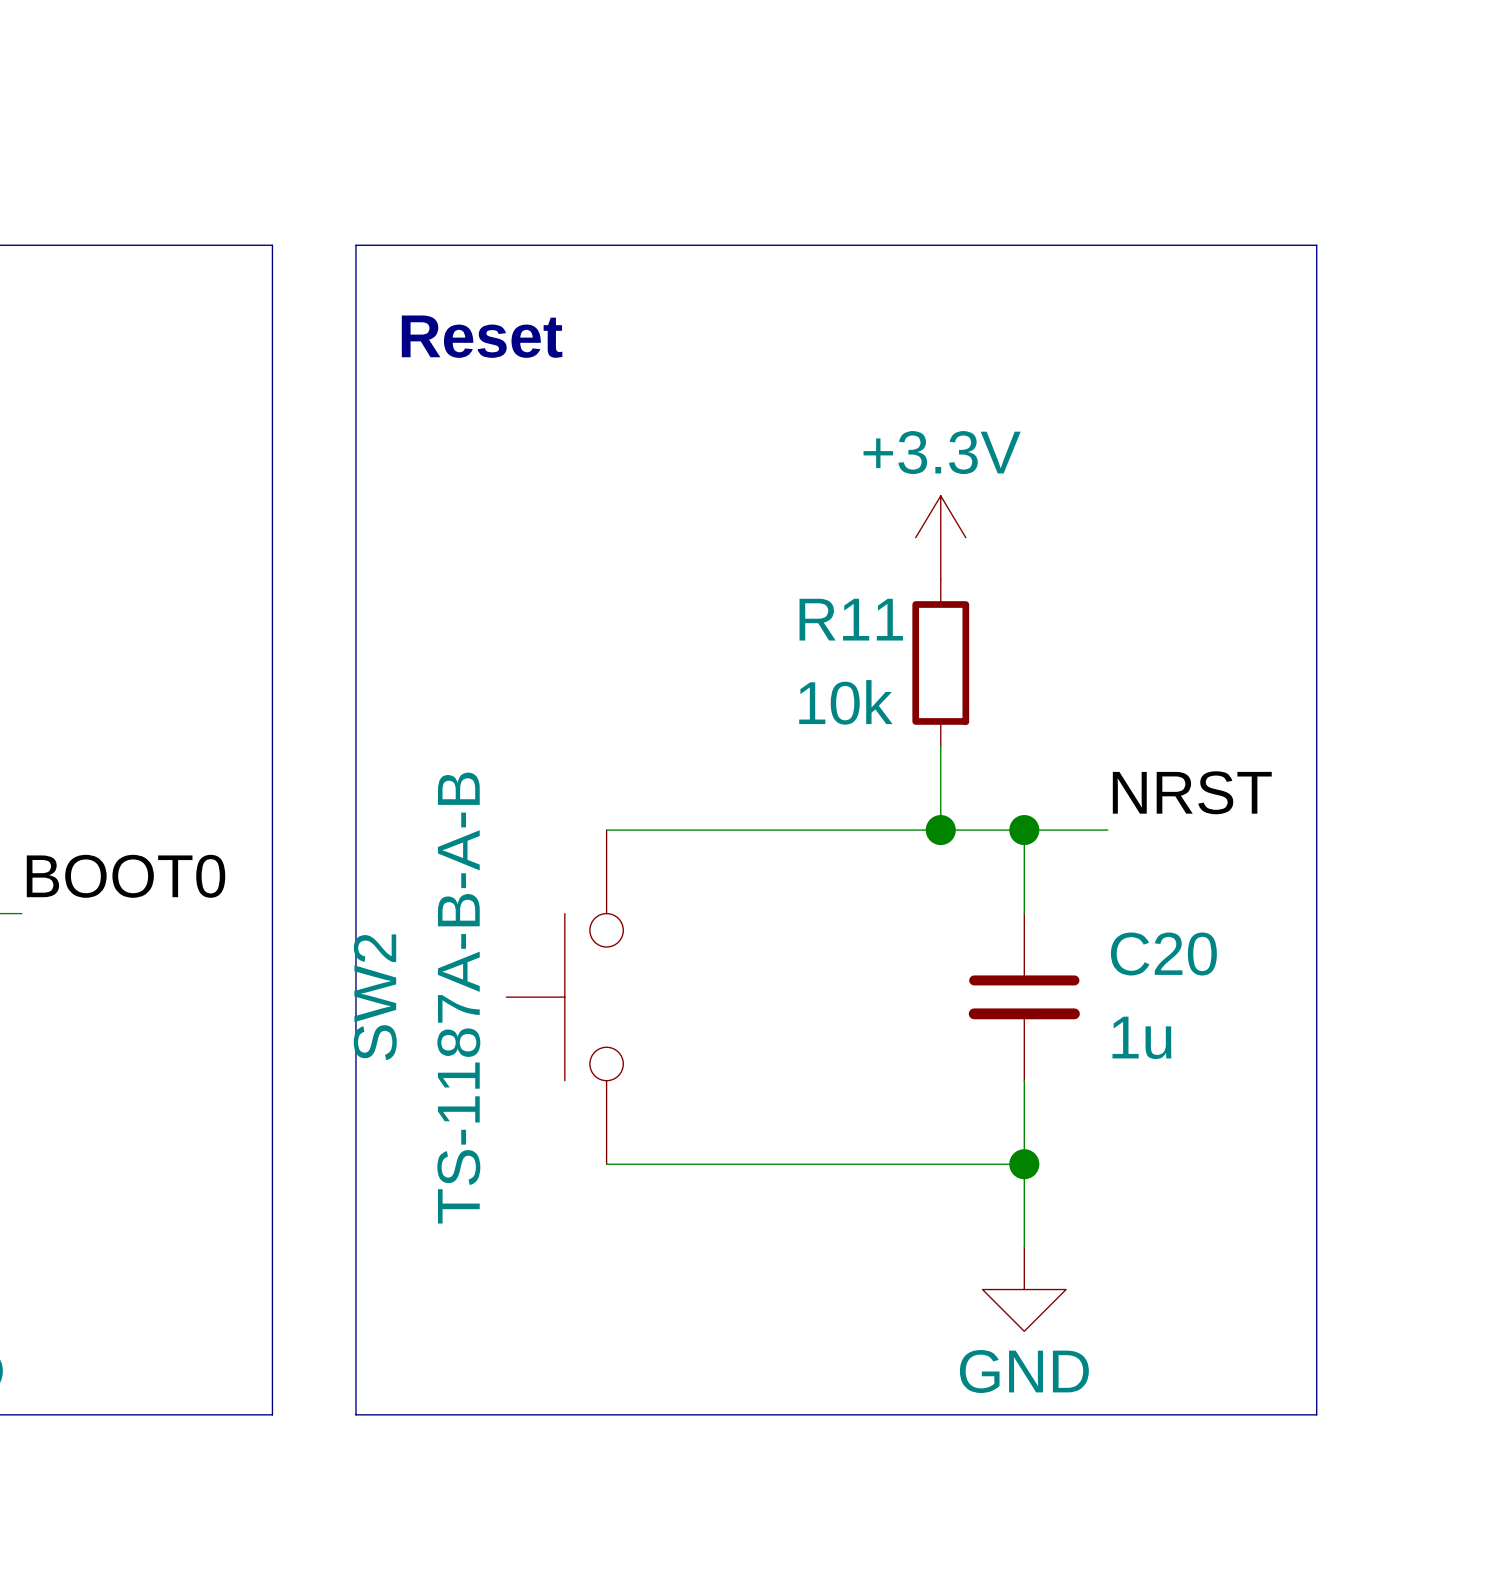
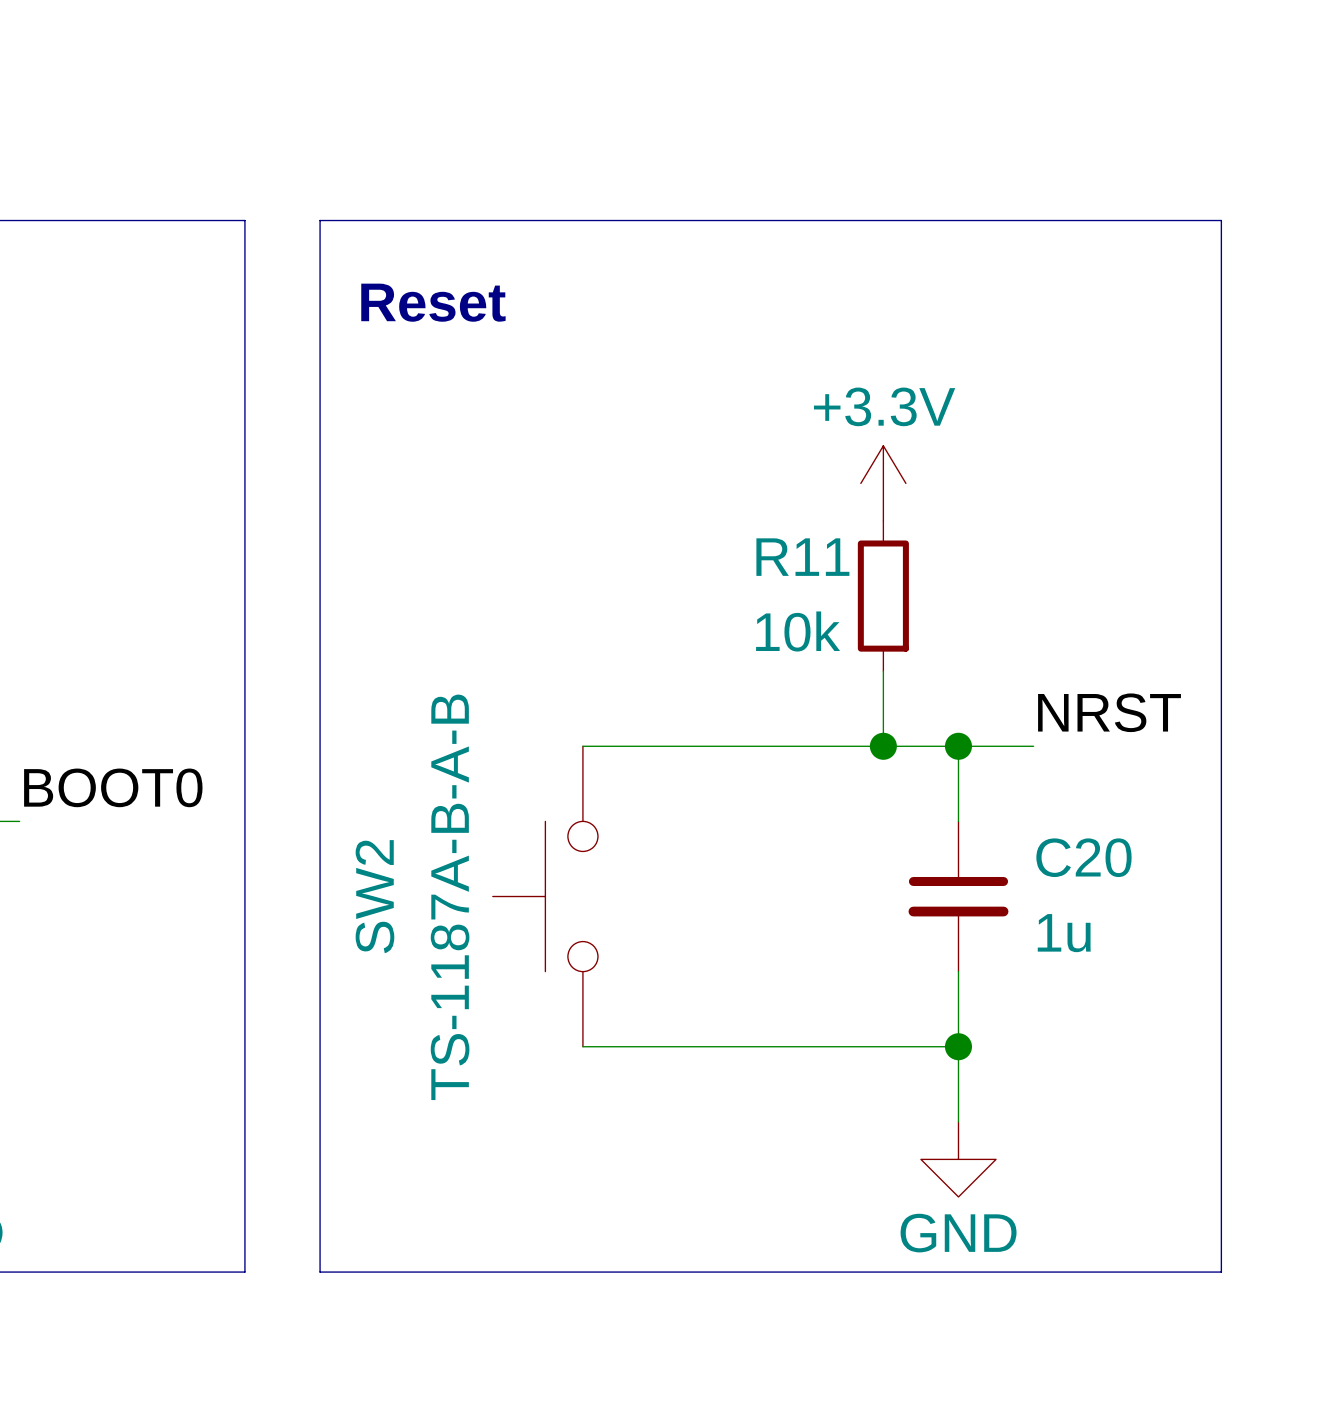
line: (1316, 245) (1316, 1414) -> (1183, 220) (1221, 220) (1221, 1272) (1183, 1272)
power symbol position: +3.3V (940, 537) -> +3.3V (883, 483)
R11 position: (940, 662) -> (883, 596)
wire: (940, 746) (940, 830) -> (883, 671) (883, 746)
label position: NRST (1192, 792) -> NRST (1109, 712)
wire: (606, 830) (648, 830) -> (996, 746) (1033, 746)
junction: (940, 830) -> none
junction: none -> (883, 746)
wire: (1024, 830) (1024, 913) -> (958, 746) (958, 821)
junction: (1024, 830) -> none
junction: none -> (958, 746)
SW2 position: (564, 997) -> (545, 896)
C20 position: (1024, 997) -> (958, 896)
wire: (1024, 1080) (1024, 1247) -> (958, 971) (958, 1121)
wire: (606, 1164) (648, 1164) -> (920, 1046) (958, 1046)
junction position: (1024, 1164) -> (958, 1046)
power symbol position: GND (1024, 1289) -> GND (958, 1159)

